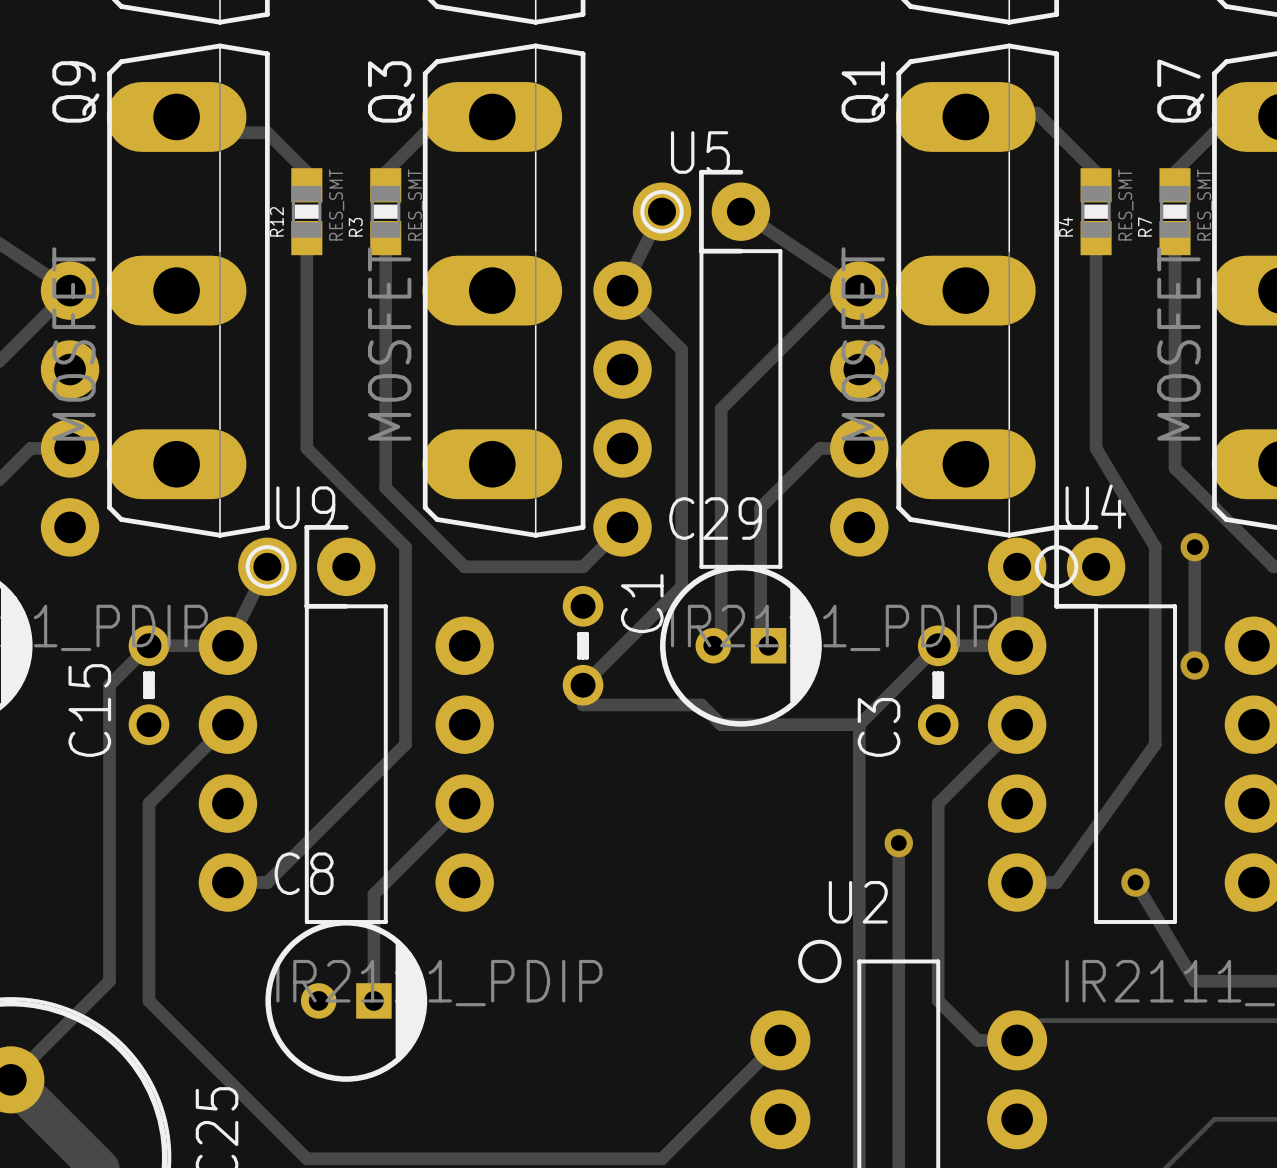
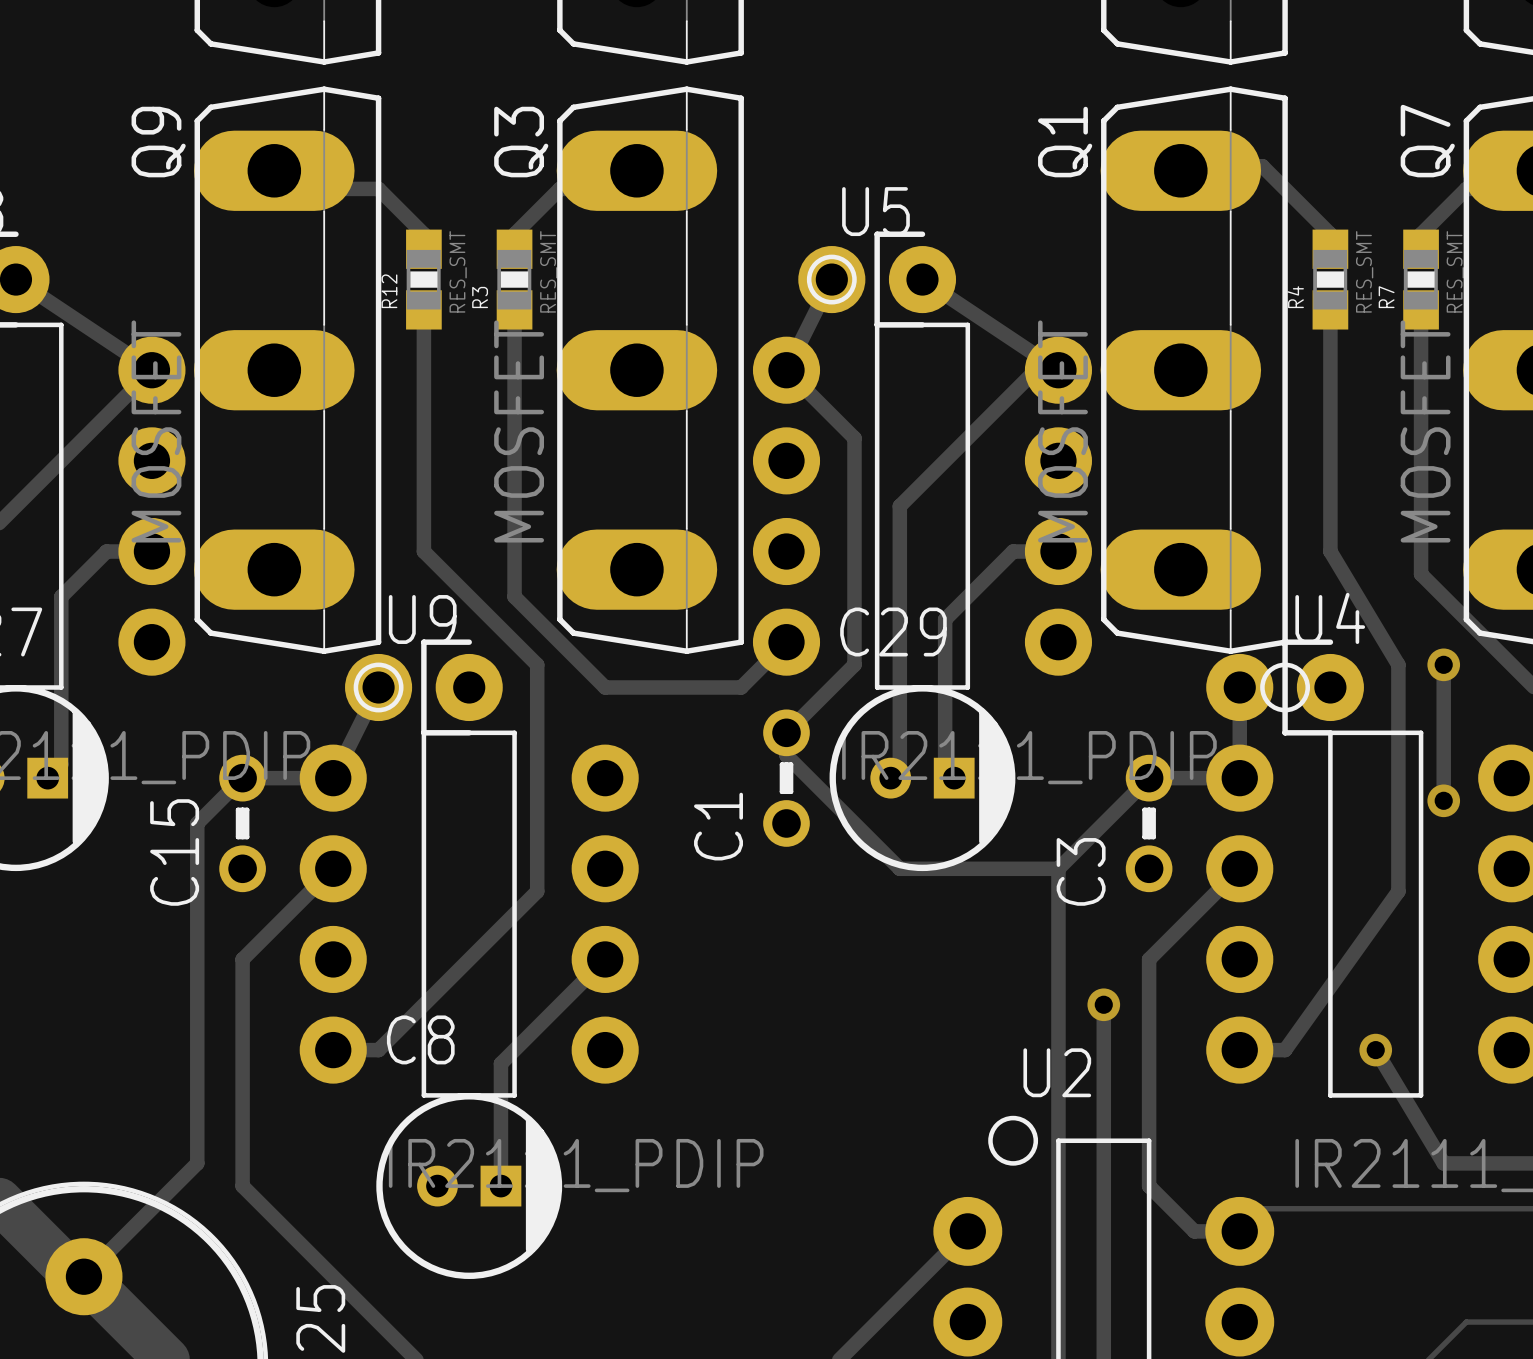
track: (681, 547) (681, 586) (583, 685) (583, 704) (701, 704) -> (854, 664) (786, 732) (786, 755) (877, 846)
C1 rotation: 0° (583, 645) -> 180° (786, 778)

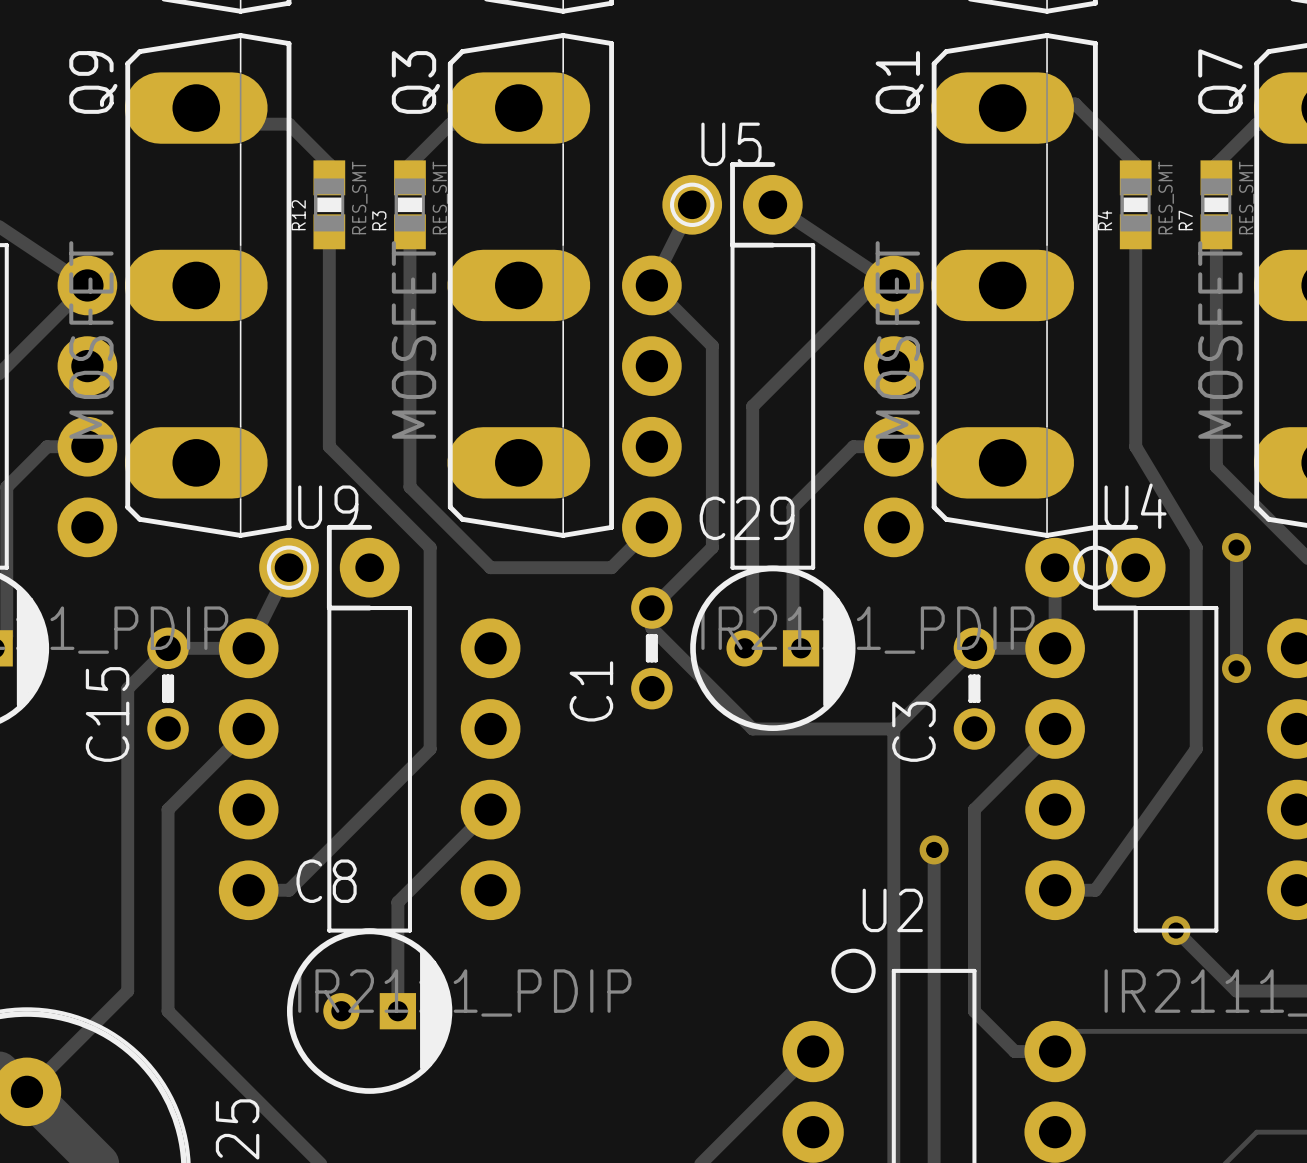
track: (1375, 1050) (1443, 1163) -> (1176, 930) (1236, 991)
via position: (1375, 1050) -> (1176, 930)

